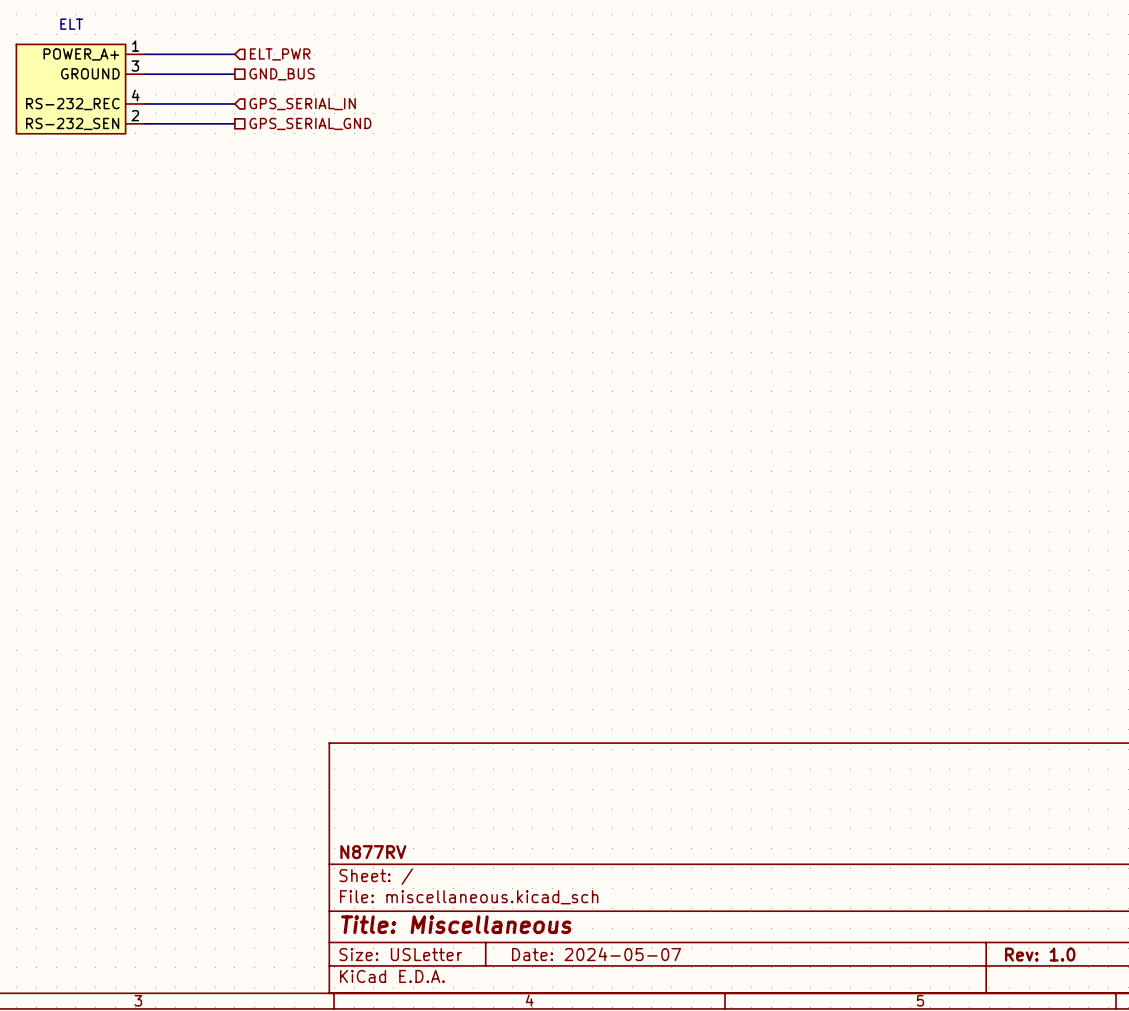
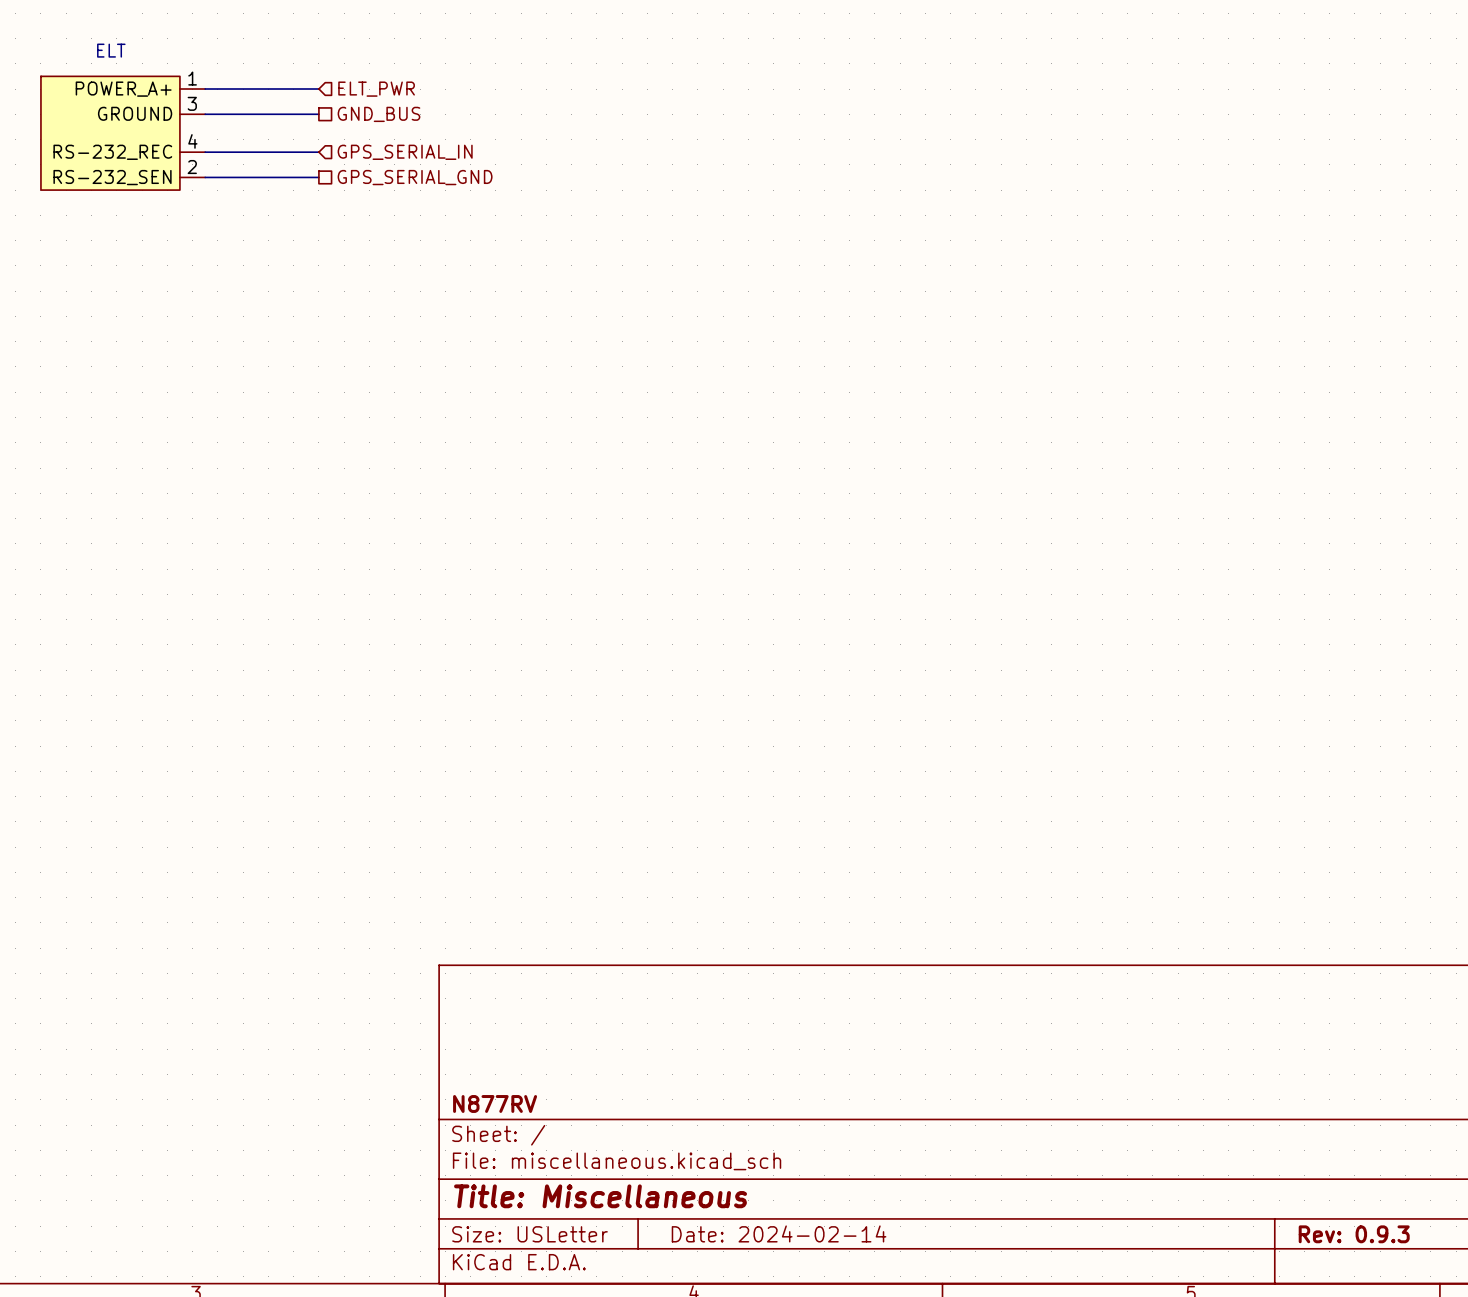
title block: Date: 2024-05-07 (596, 954) -> Date: 2024-02-14 (779, 1233)
title block: Rev: 1.0 (1040, 954) -> Rev: 0.9.3 (1354, 1234)

